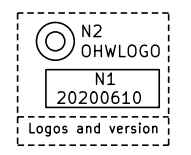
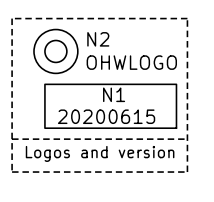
N1 value: 20200610 (99, 97) -> 20200615 (106, 116)

